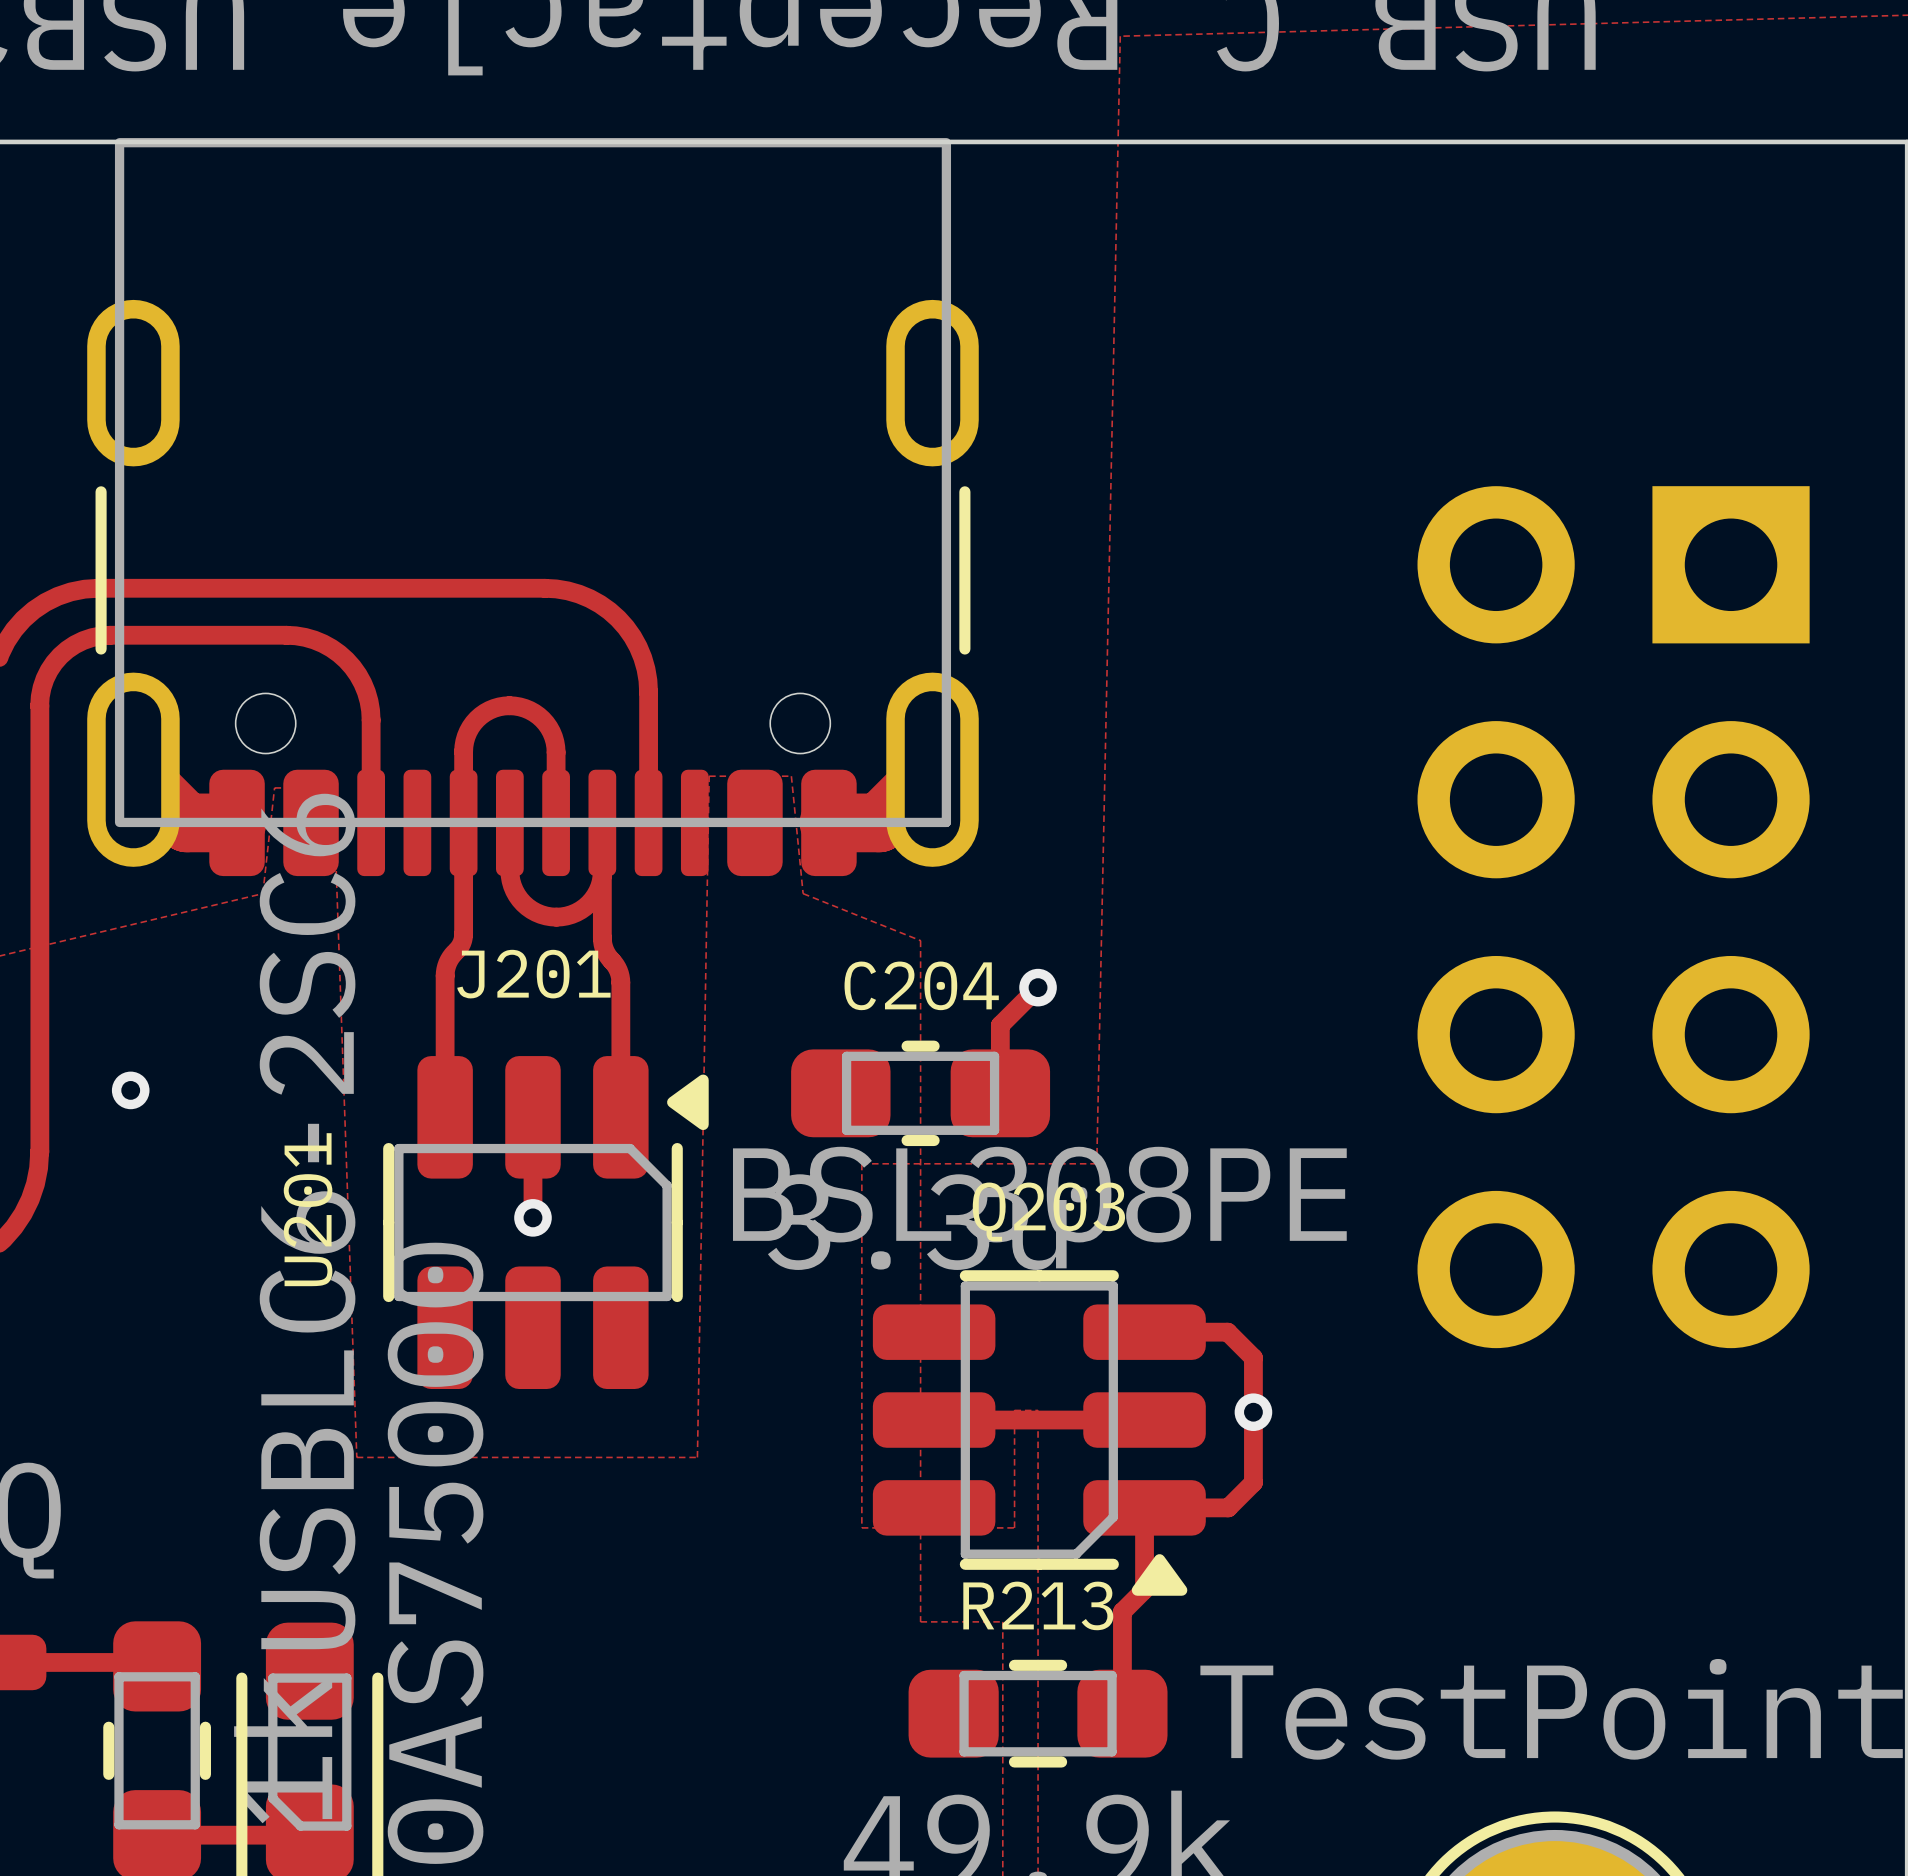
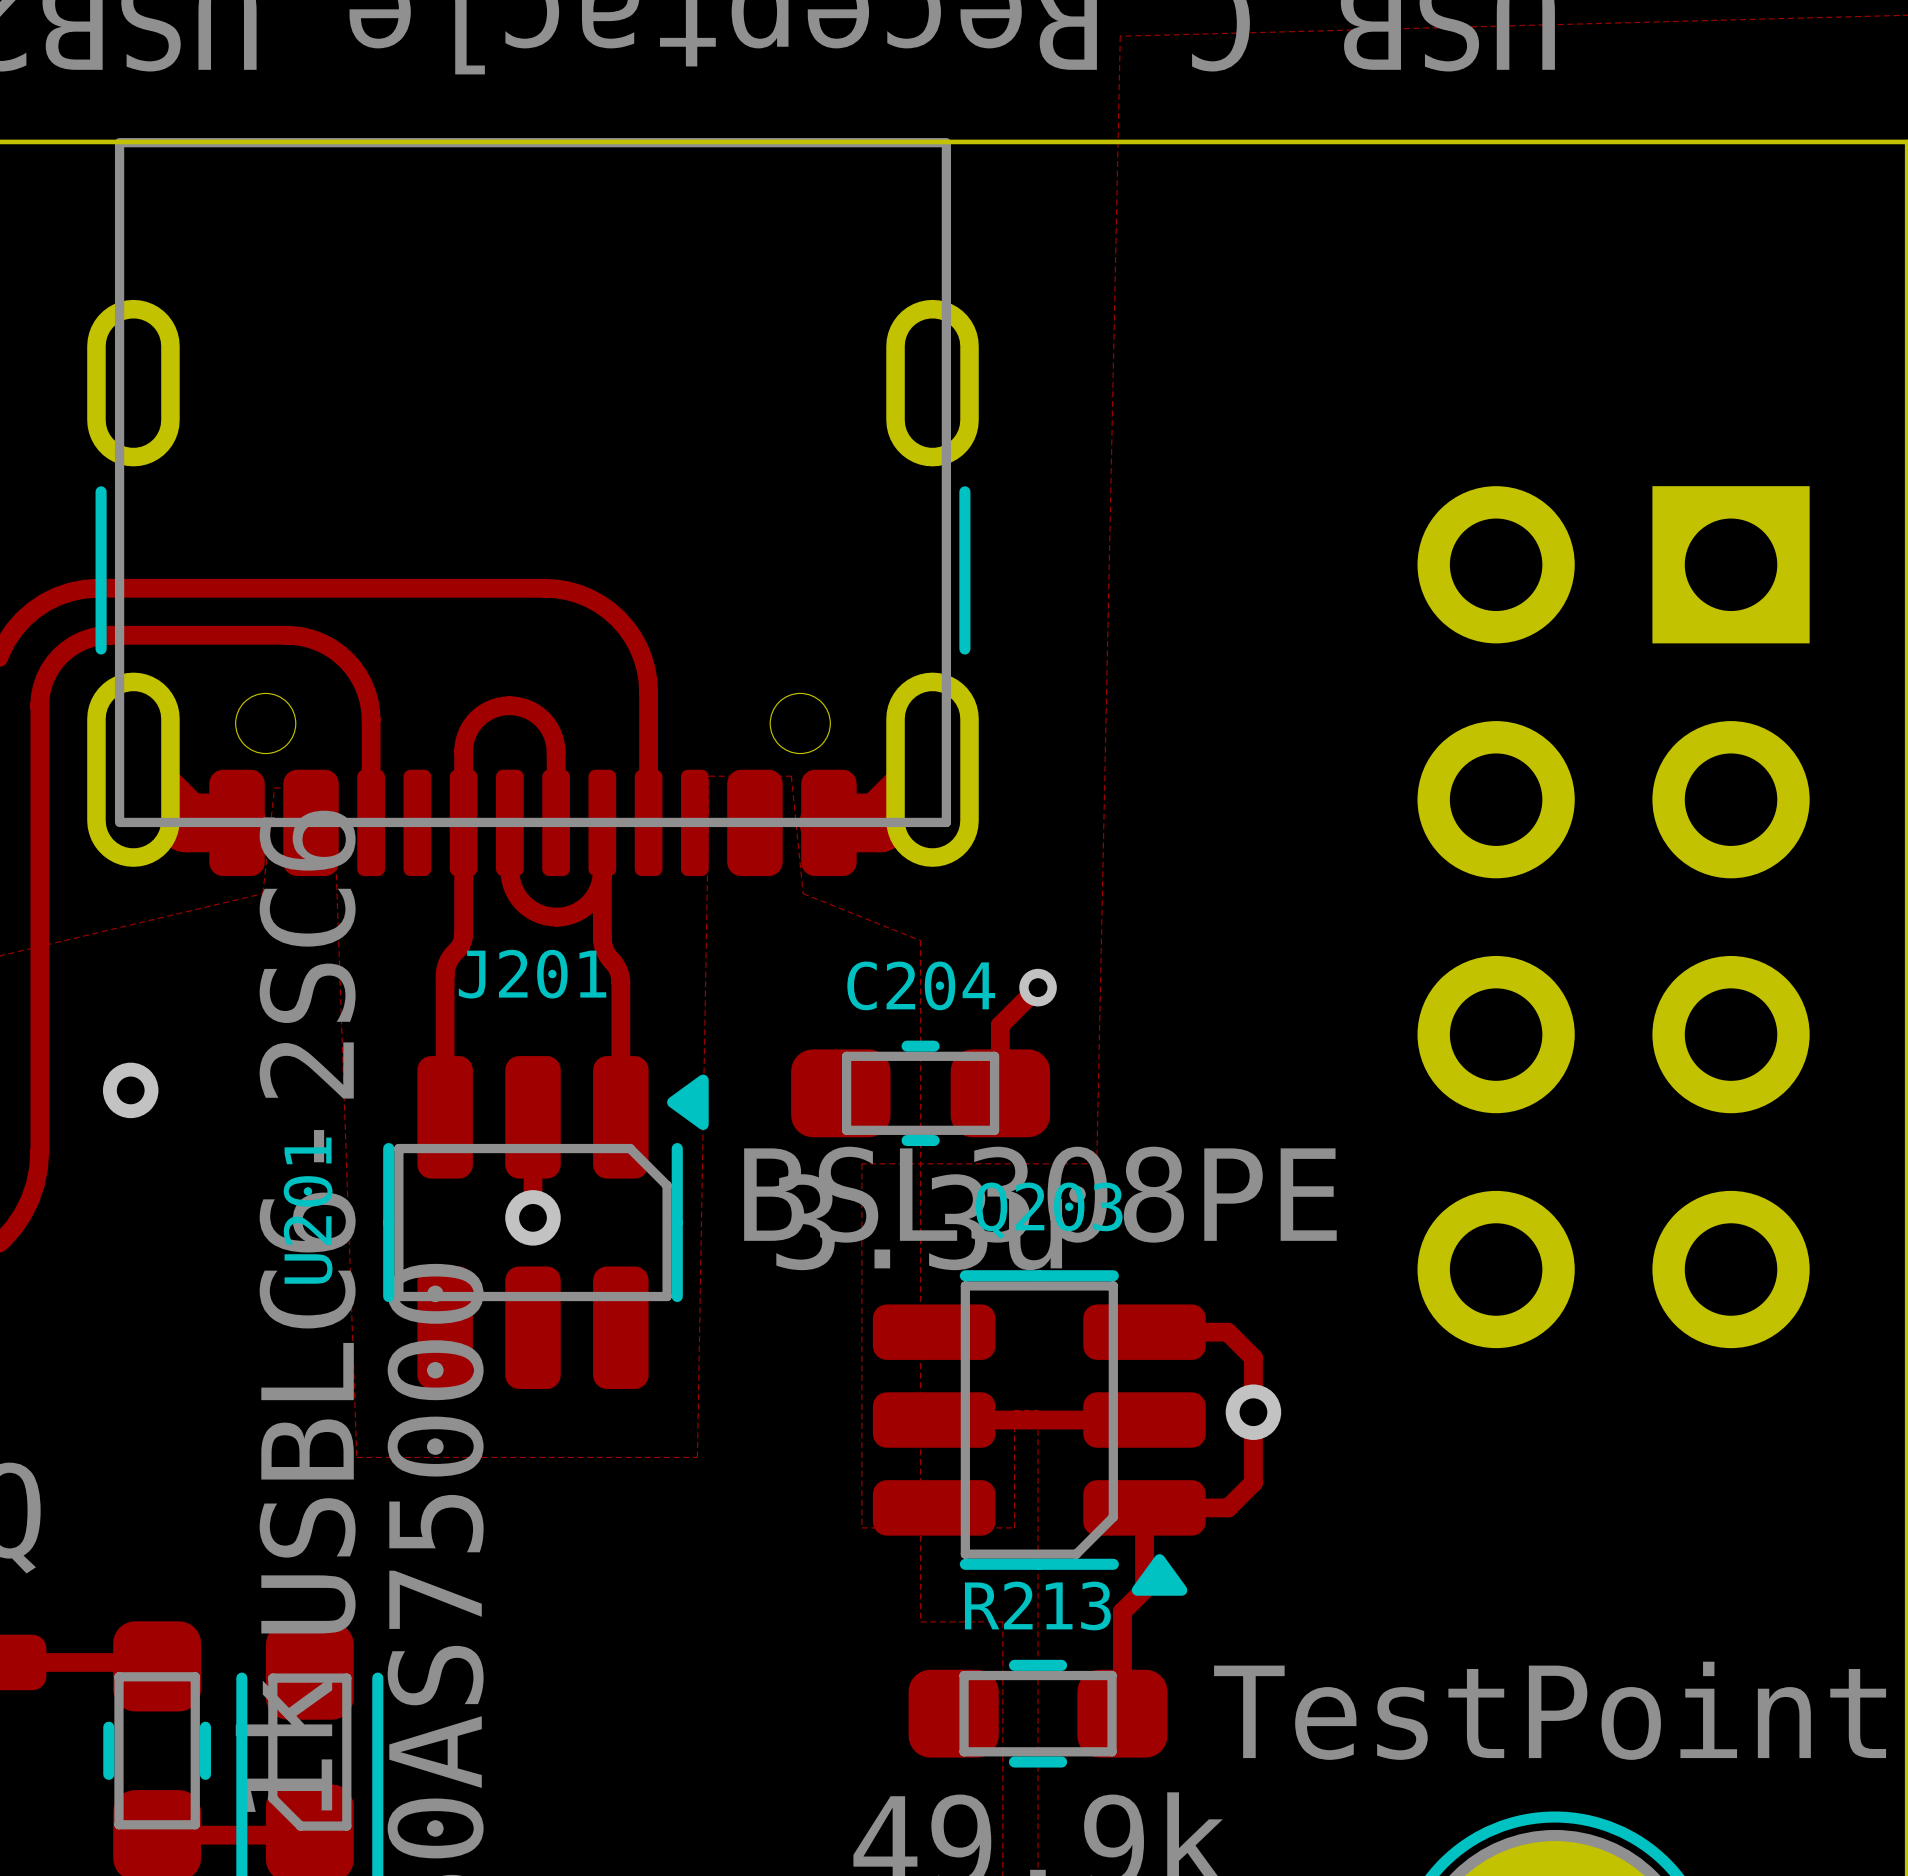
via size: [111, 1071, 150, 1110] -> [102, 1062, 159, 1119]
via size: [514, 1199, 552, 1237] -> [505, 1190, 561, 1246]
via size: [1234, 1393, 1273, 1432] -> [1225, 1384, 1282, 1440]

